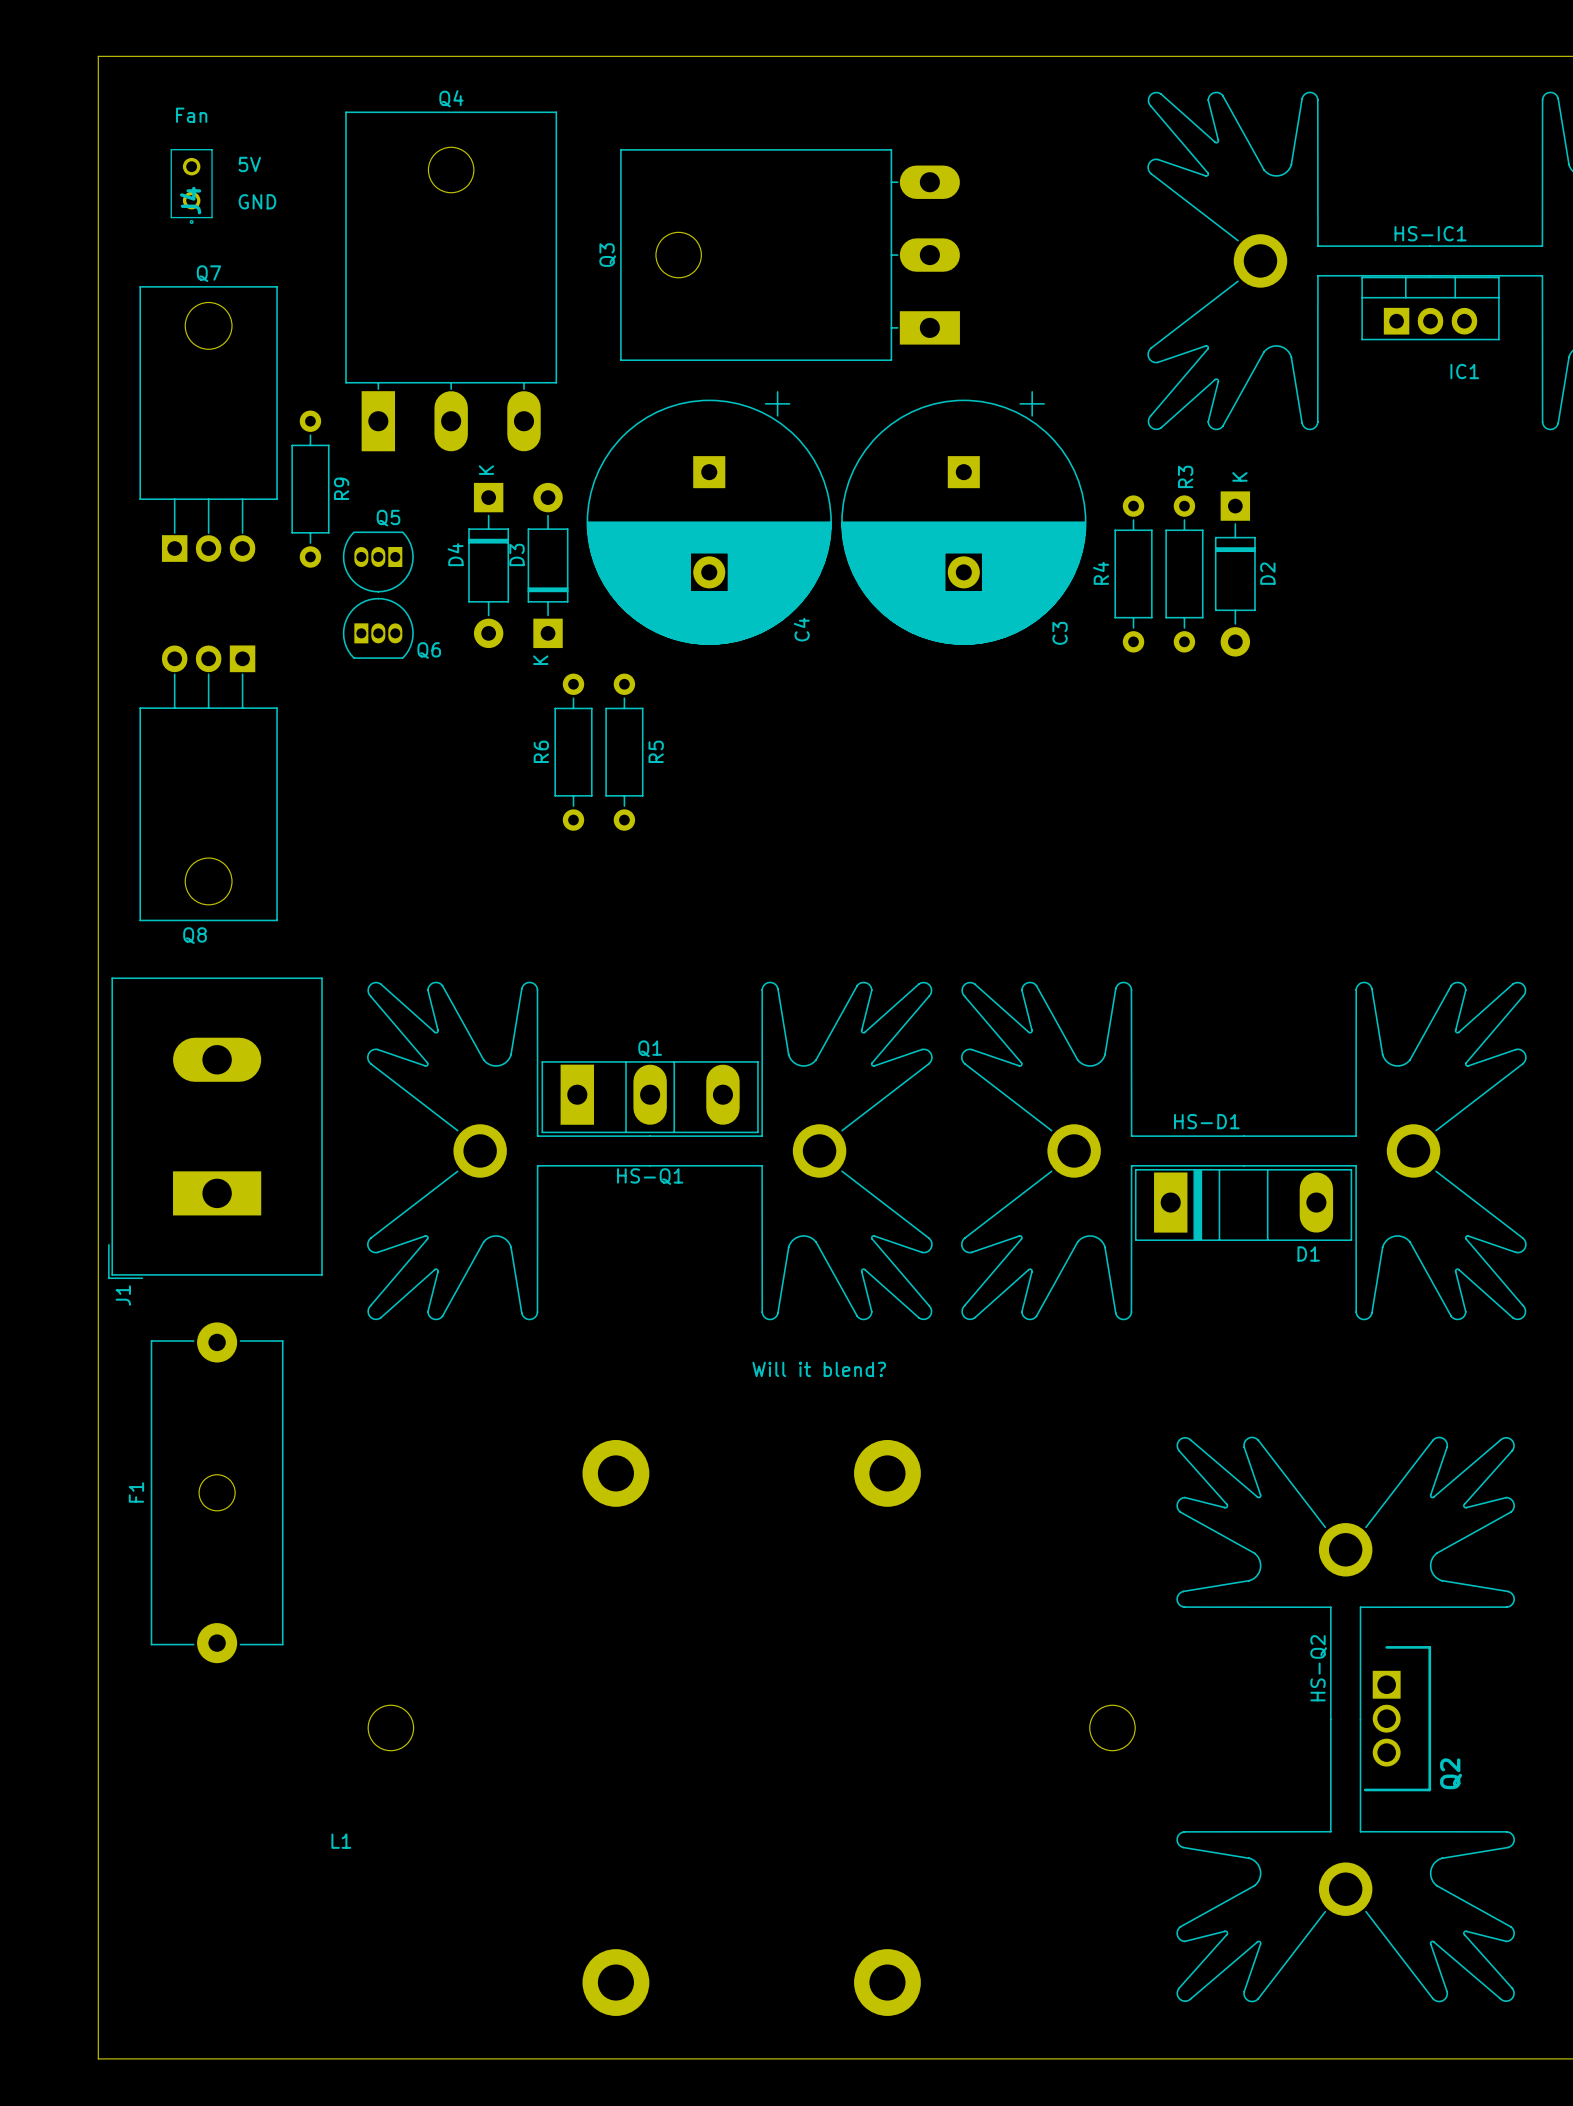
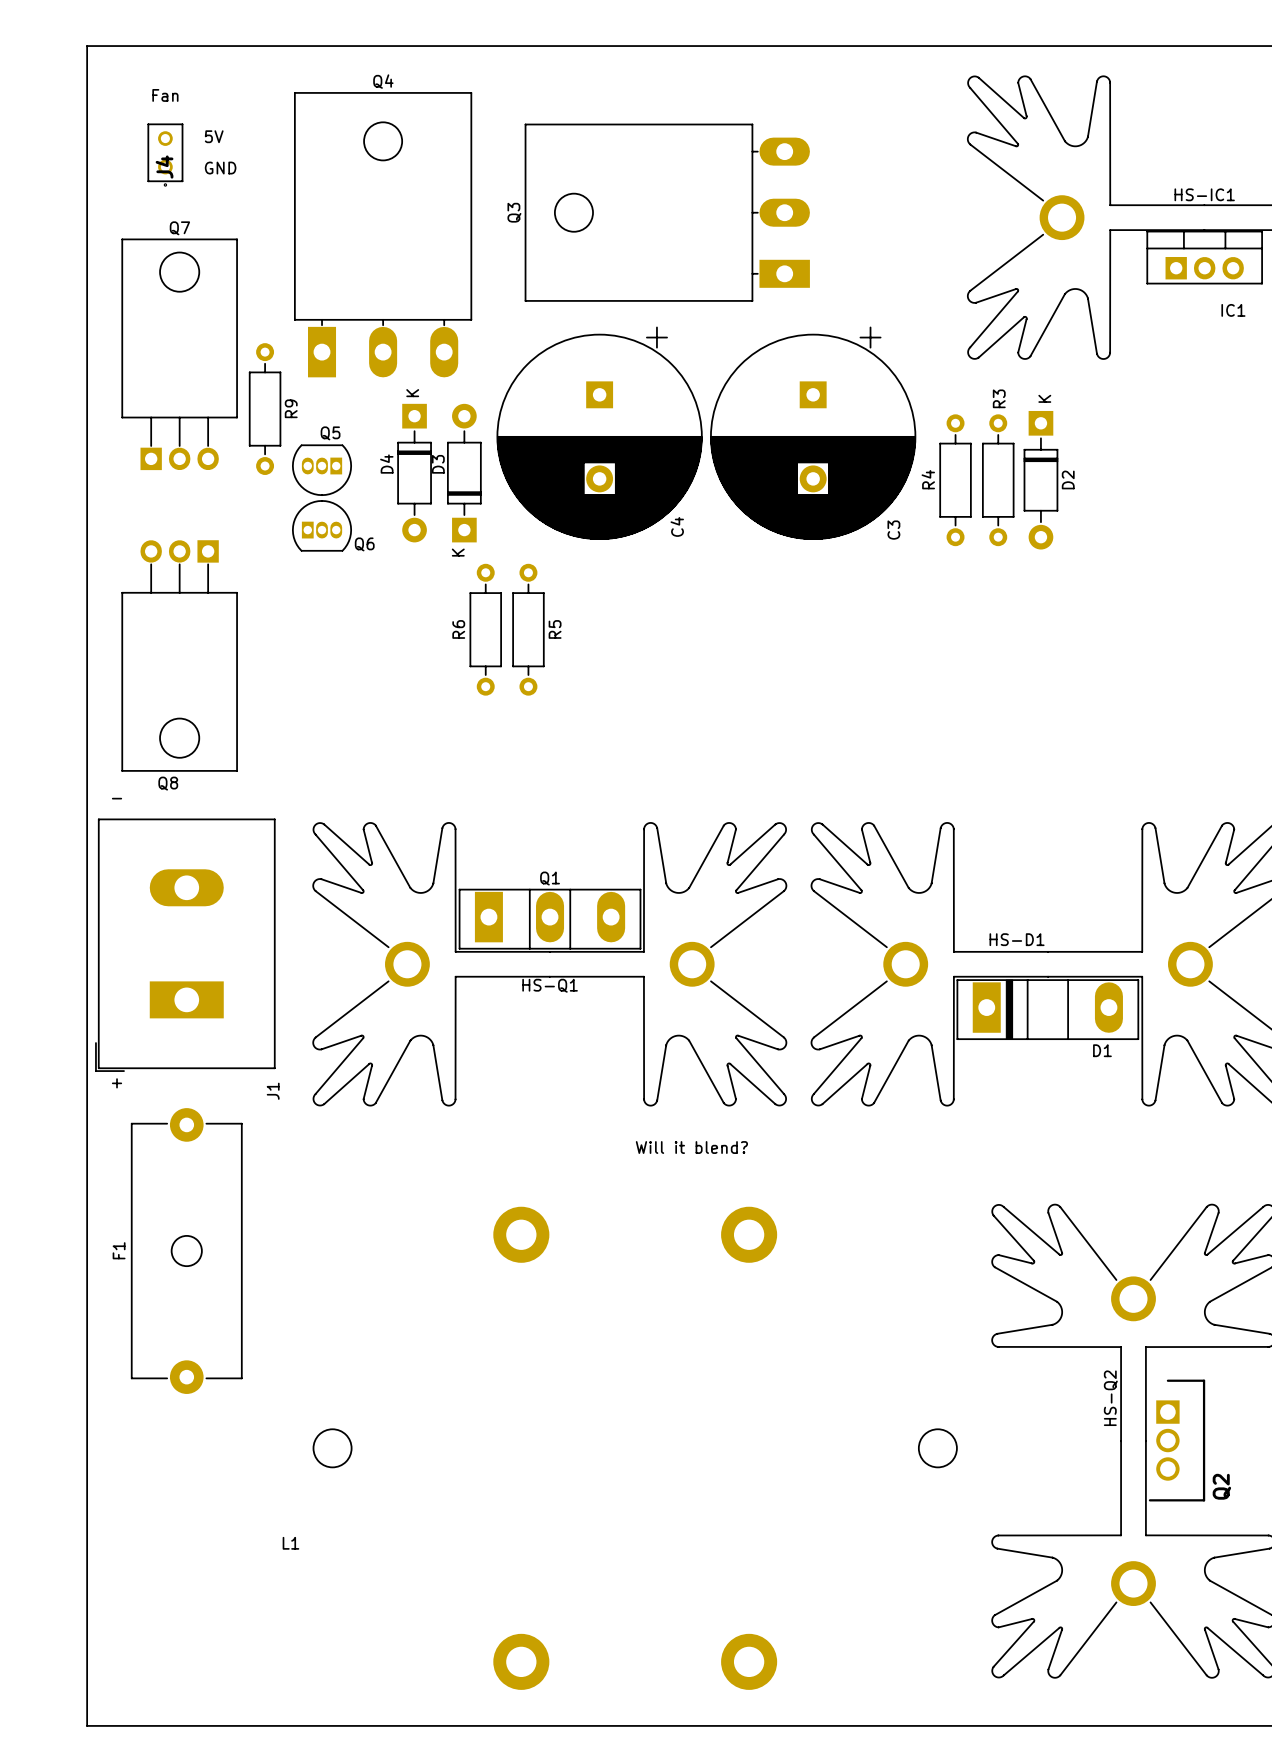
text: none -> - (117, 798)
text: none -> + (117, 1083)
J1 name position: J1 (123, 1295) -> J1 (273, 1091)

